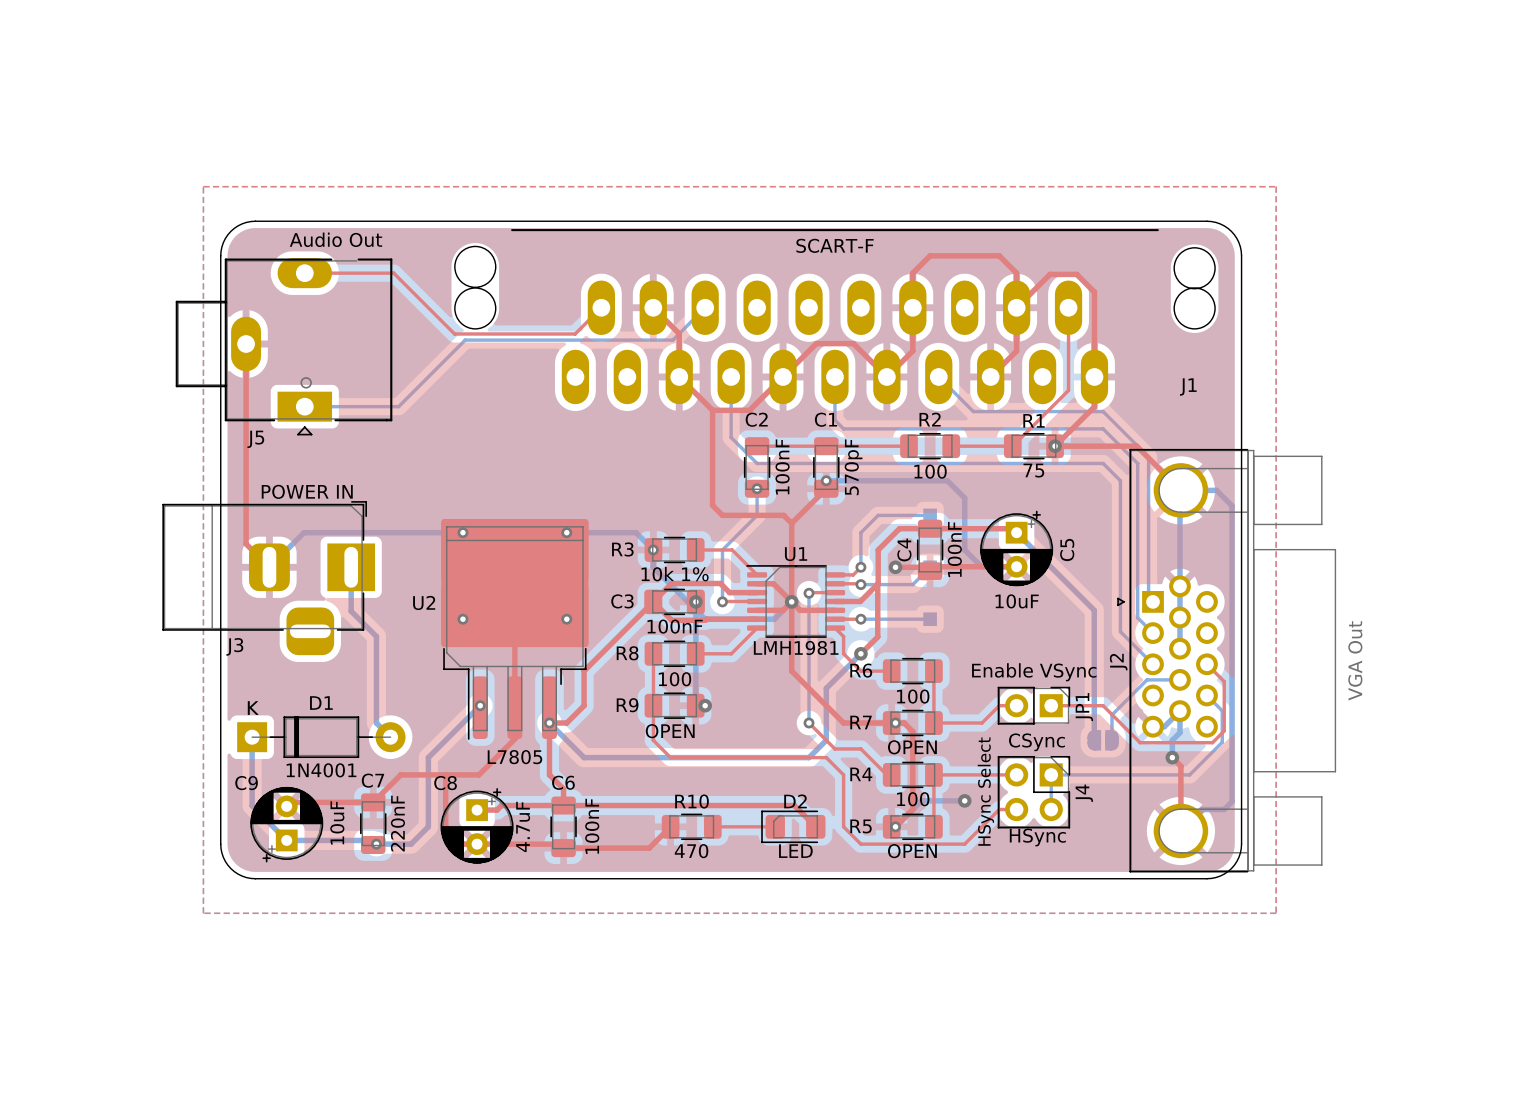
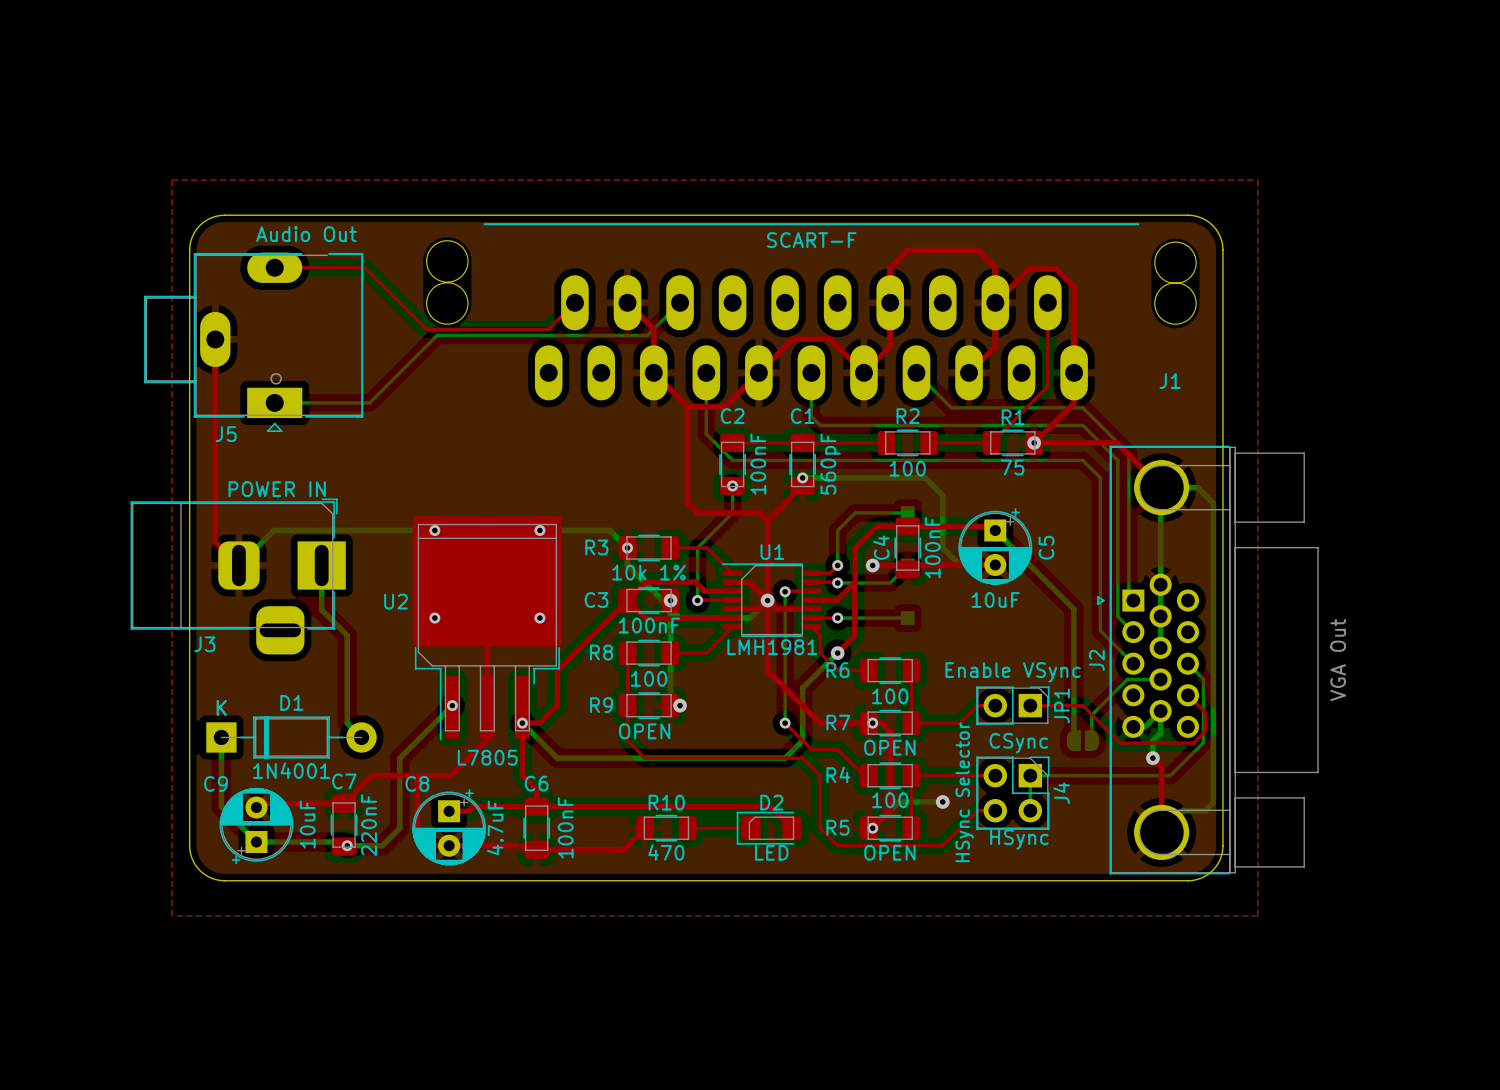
C1 value: 570pF (853, 467) -> 560pF (830, 464)
top track: (1206, 664) (1224, 681) (1224, 712) -> (1187, 695) (1205, 712)
bottom track: (1206, 695) (1222, 710) -> (1187, 663) (1203, 679) (1203, 710)
J4 value: HSync Select (985, 791) -> HSync Selector (964, 792)

